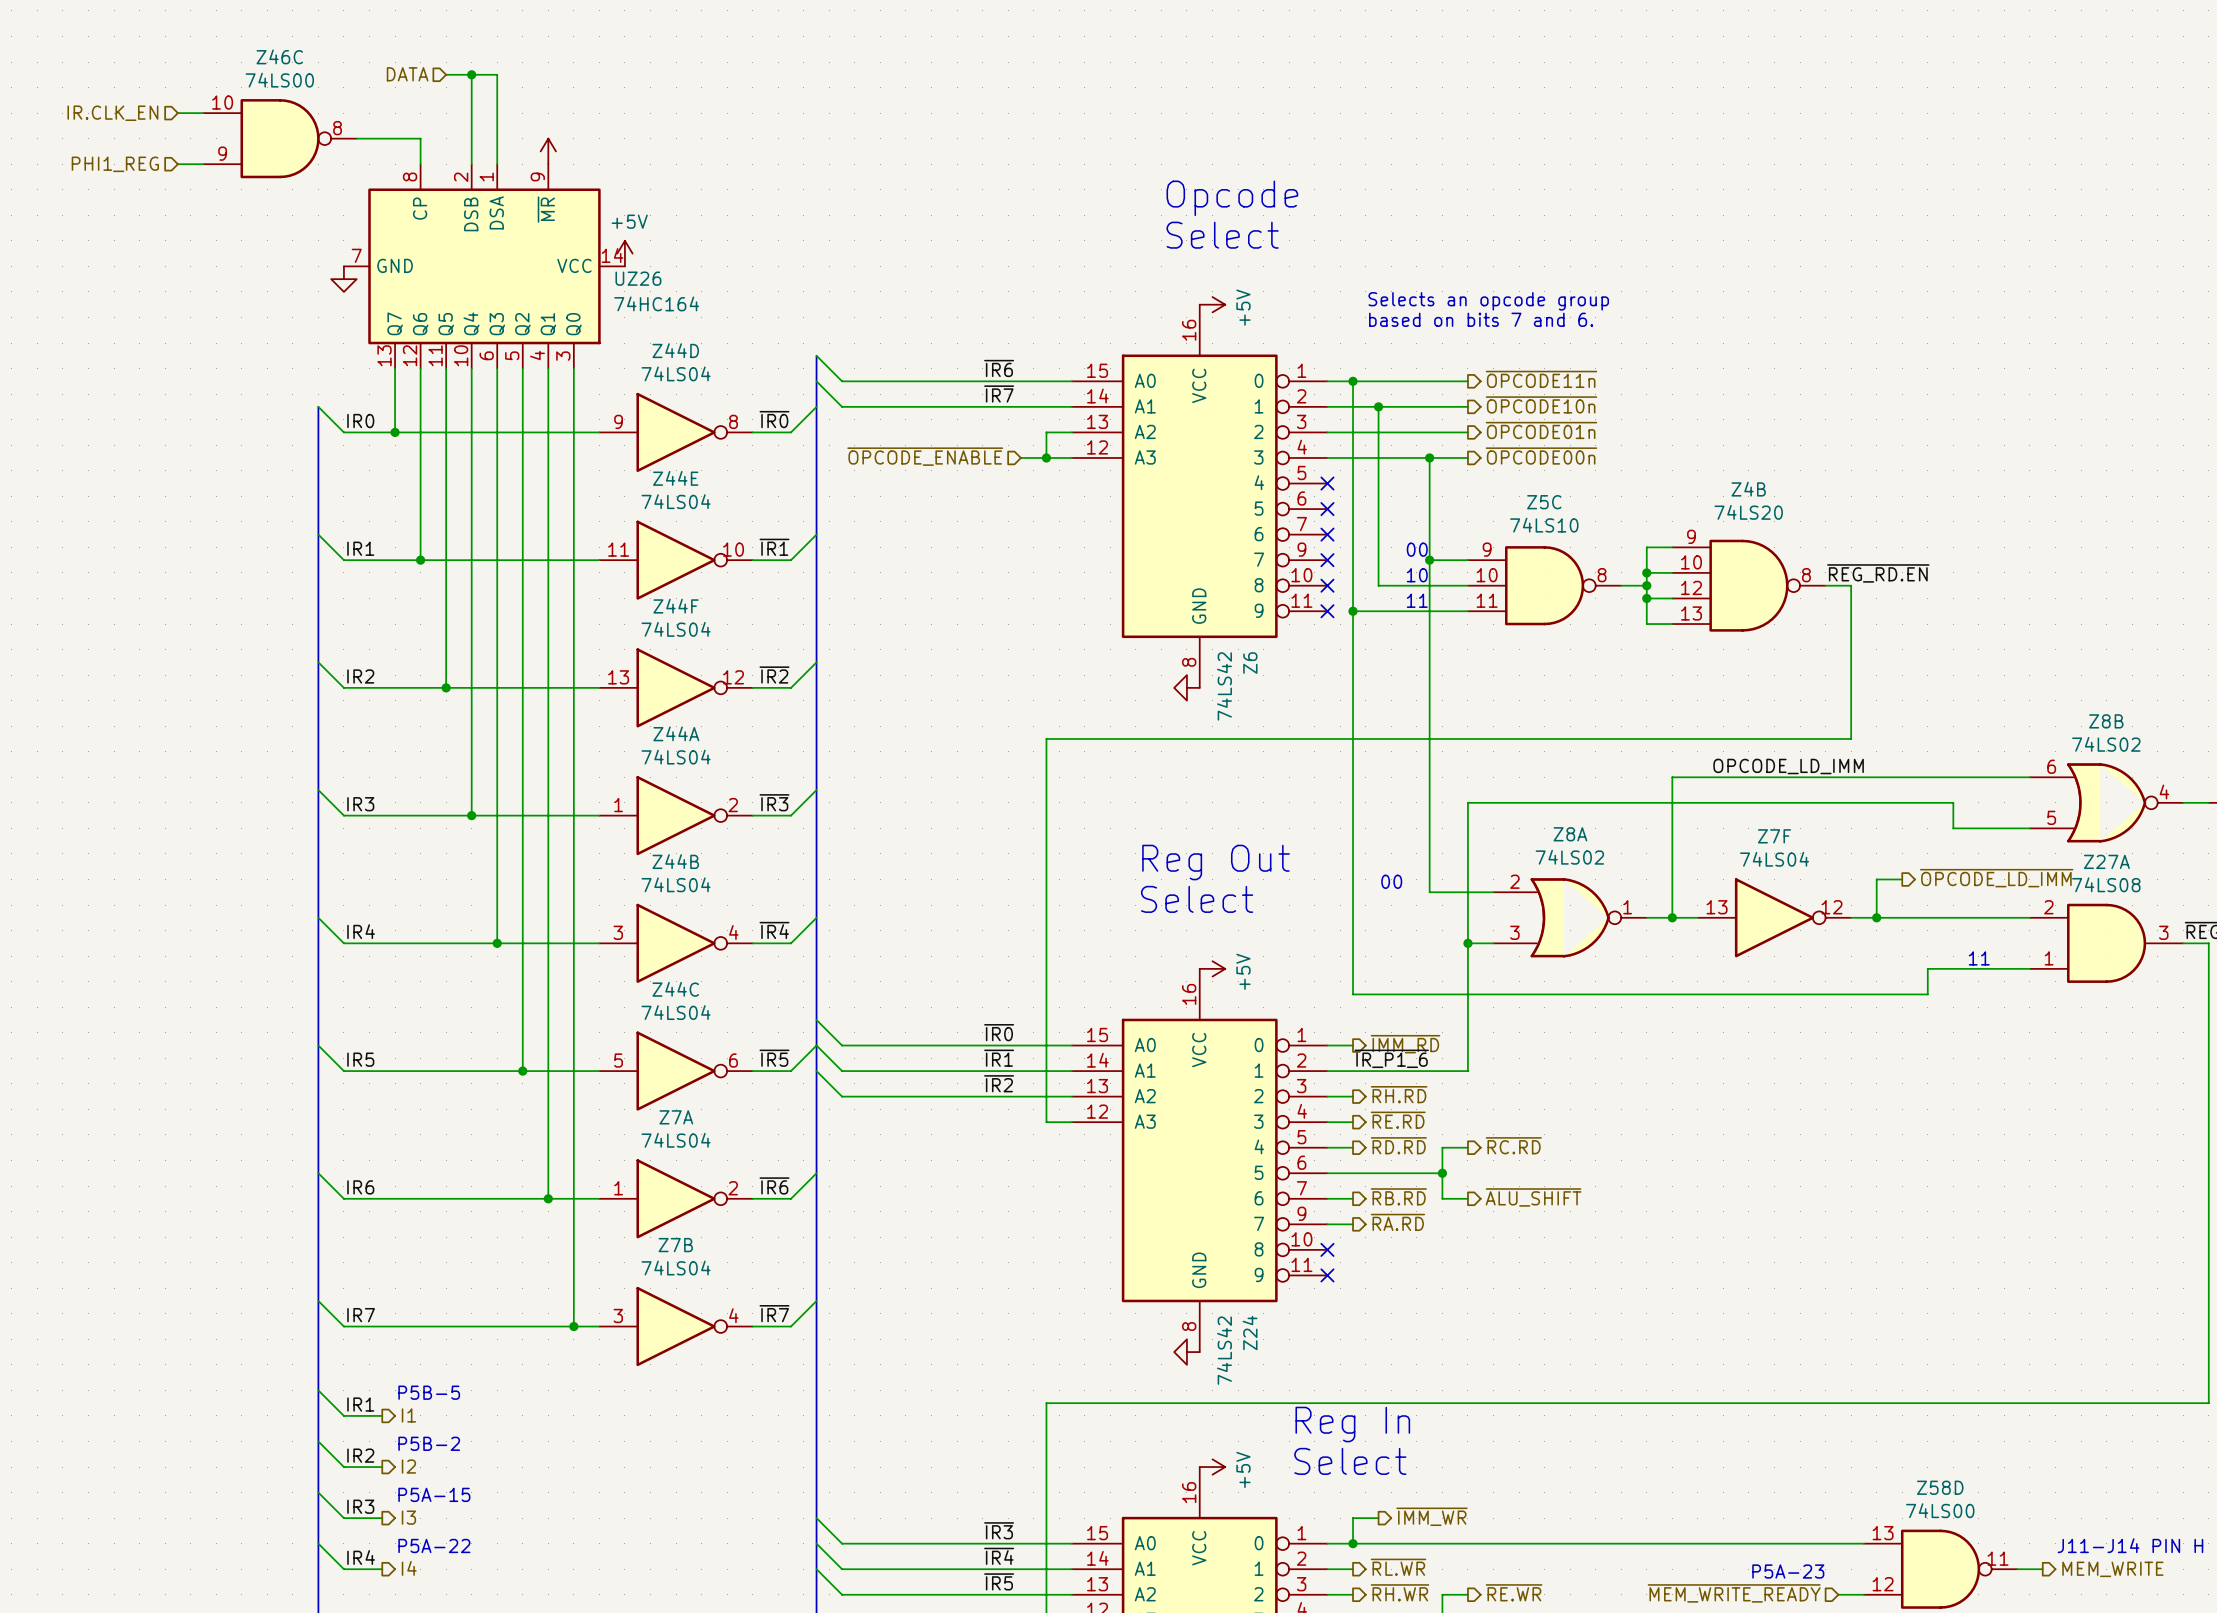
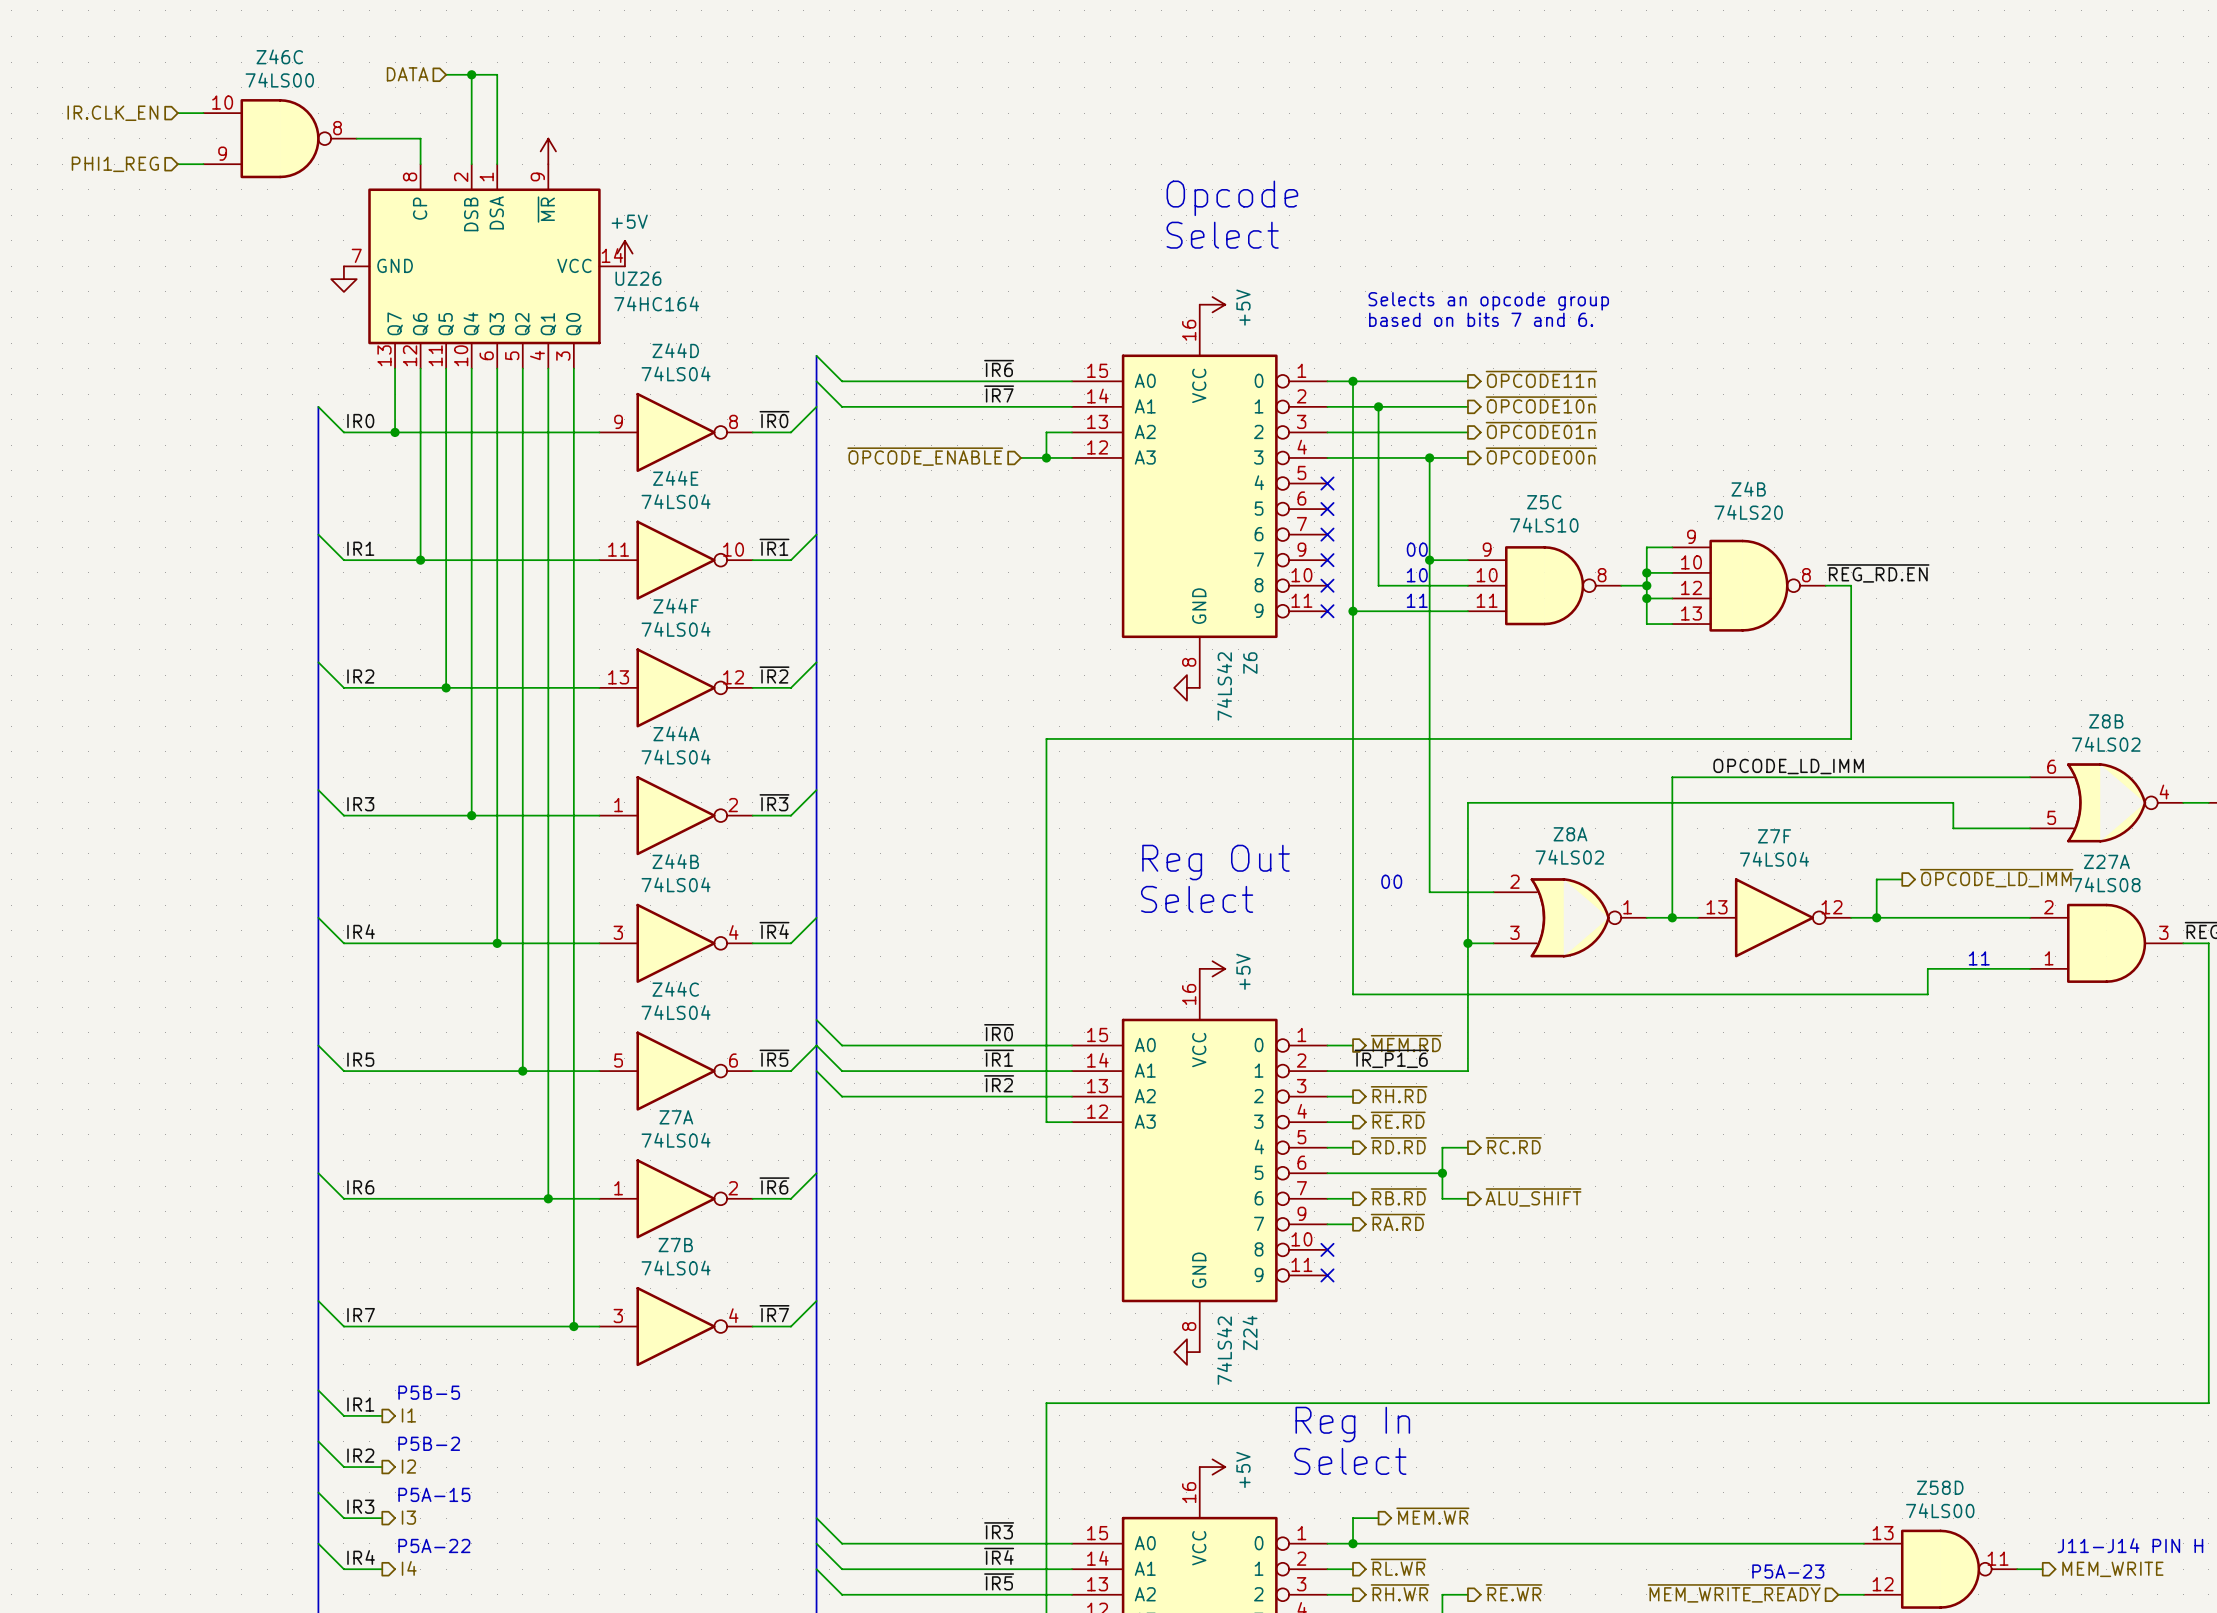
hierarchical label: ~{IMM_RD} (1405, 1044) -> ~{MEM.RD} (1406, 1043)
hierarchical label: ~{IMM_WR} (1431, 1516) -> ~{MEM.WR} (1432, 1516)

